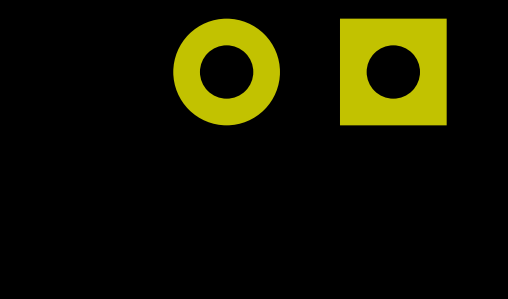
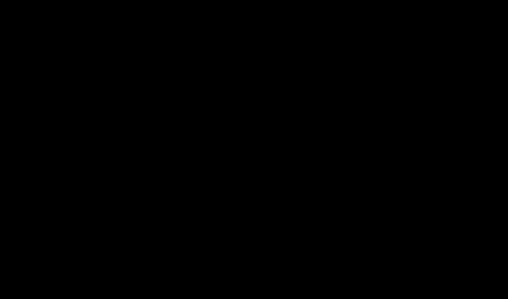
part: (309, 72) -> none

